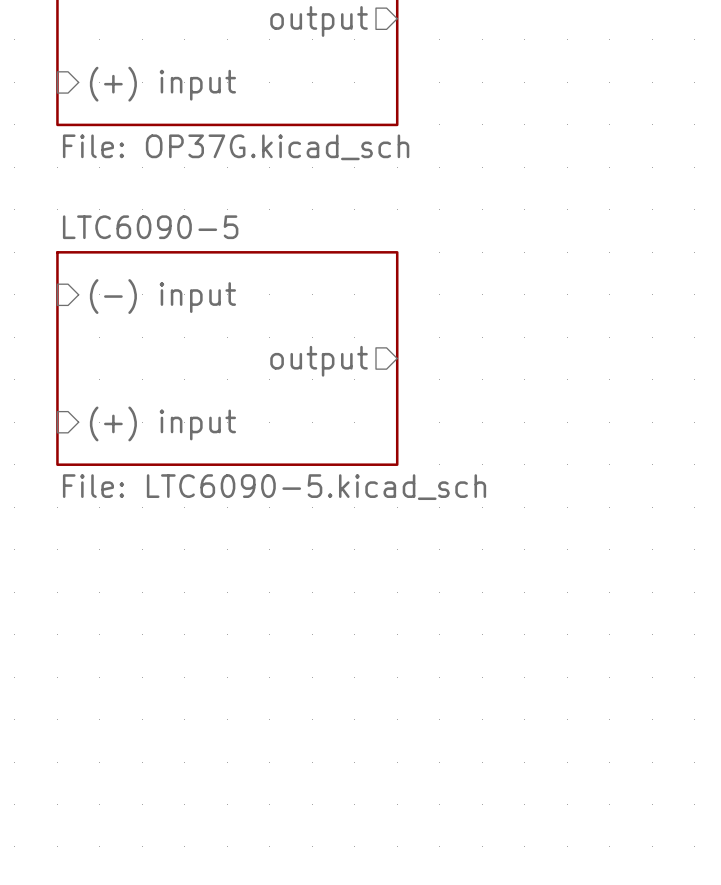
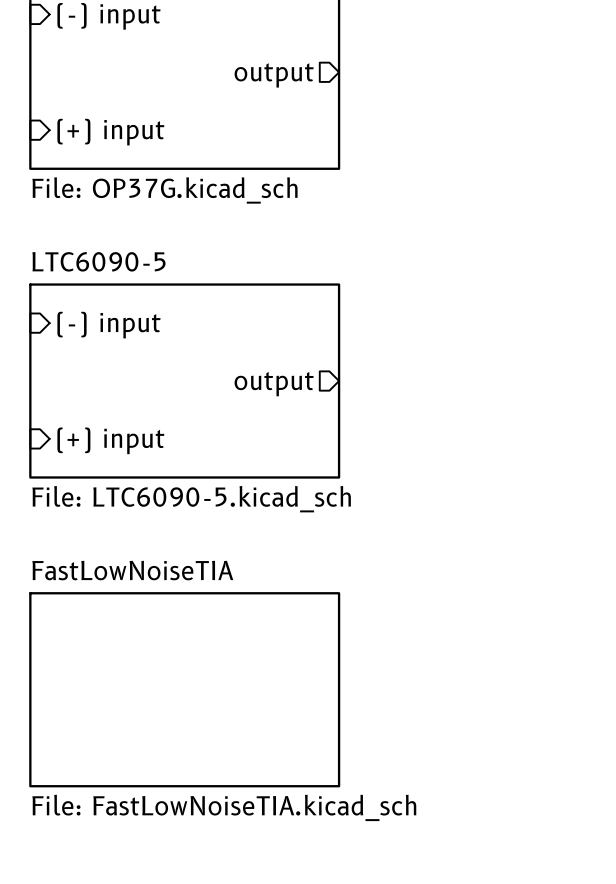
sheet FastLowNoiseTIA: none -> File: FastLowNoiseTIA.kicad_sch (184, 689)

